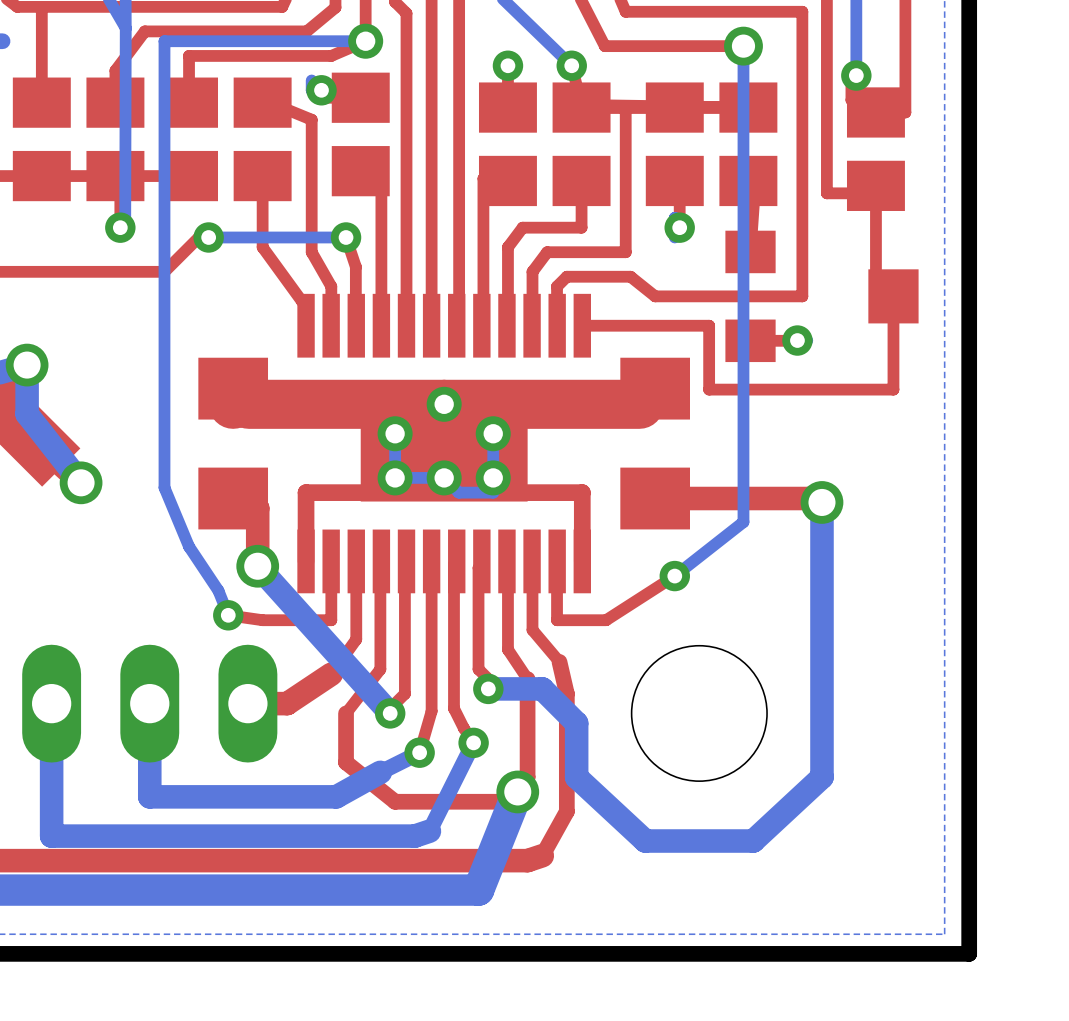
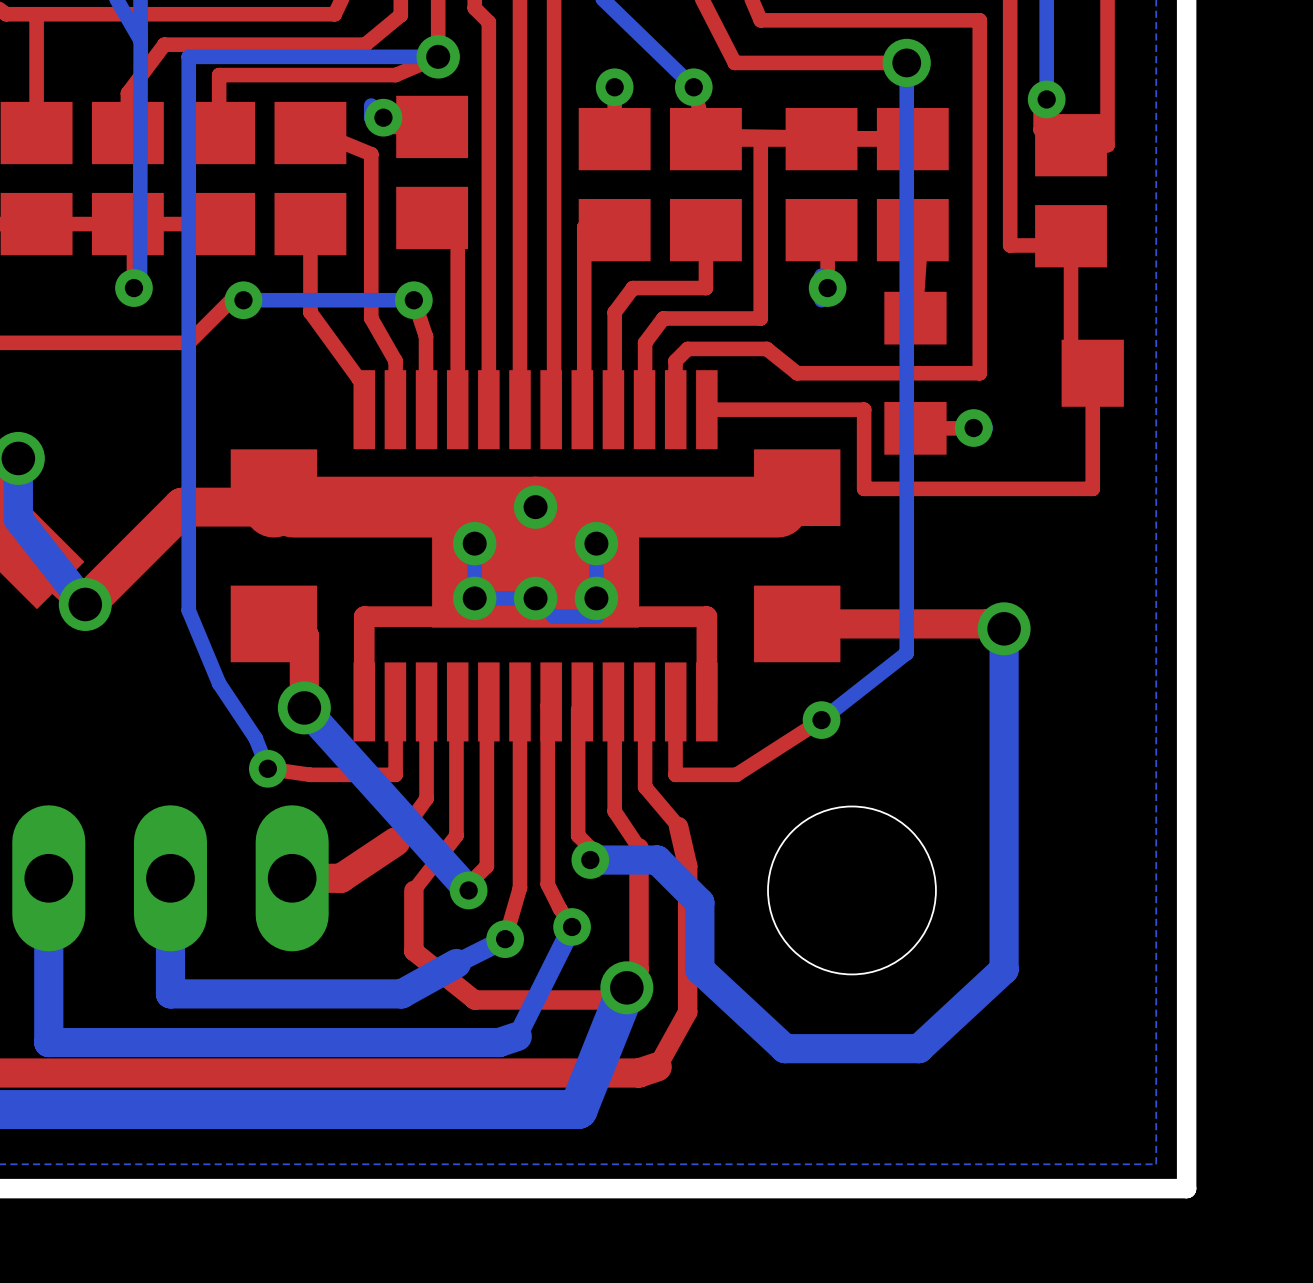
top track: none -> (273, 507) (182, 507) (85, 604)

